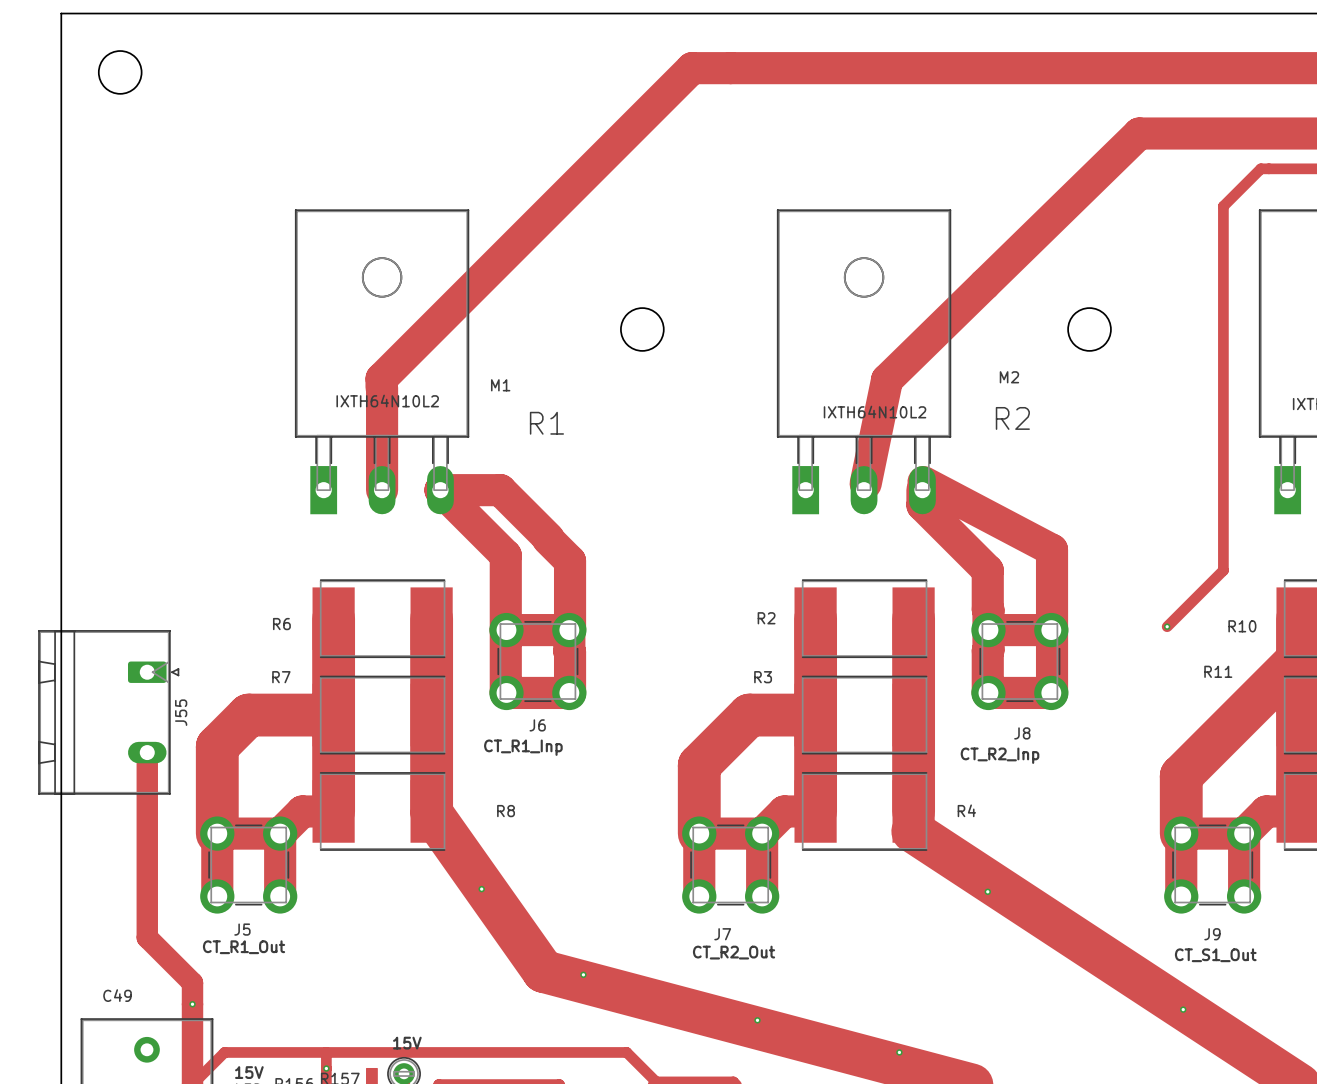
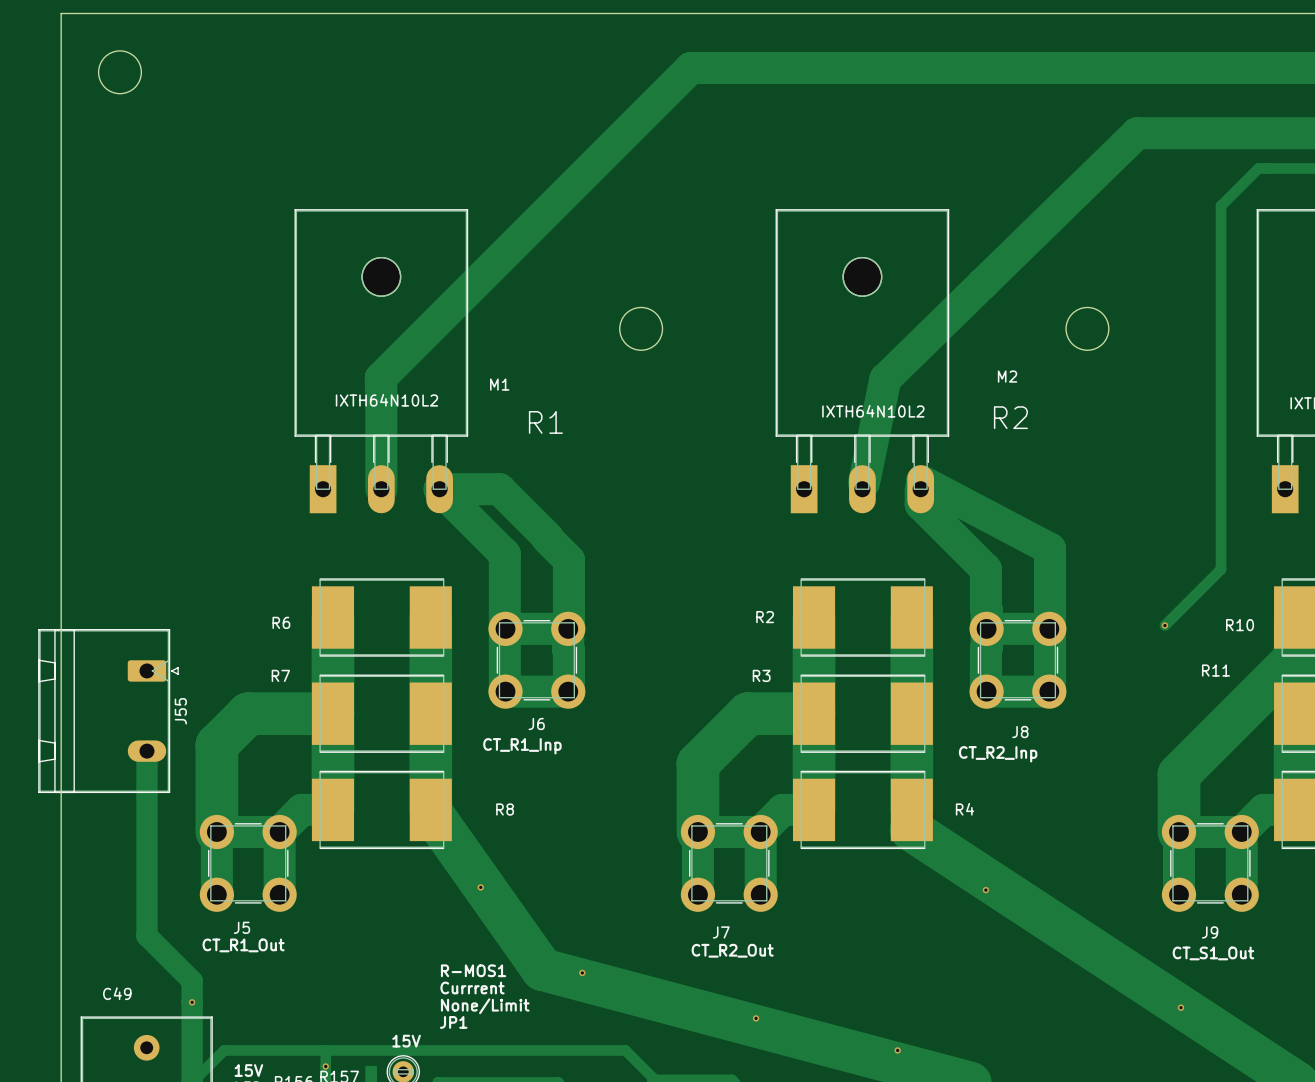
text: none -> R-MOS1 (473, 970)
text: none -> Currrent (472, 987)
text: none -> None/Limit (485, 1006)
text: none -> JP1 (453, 1022)

